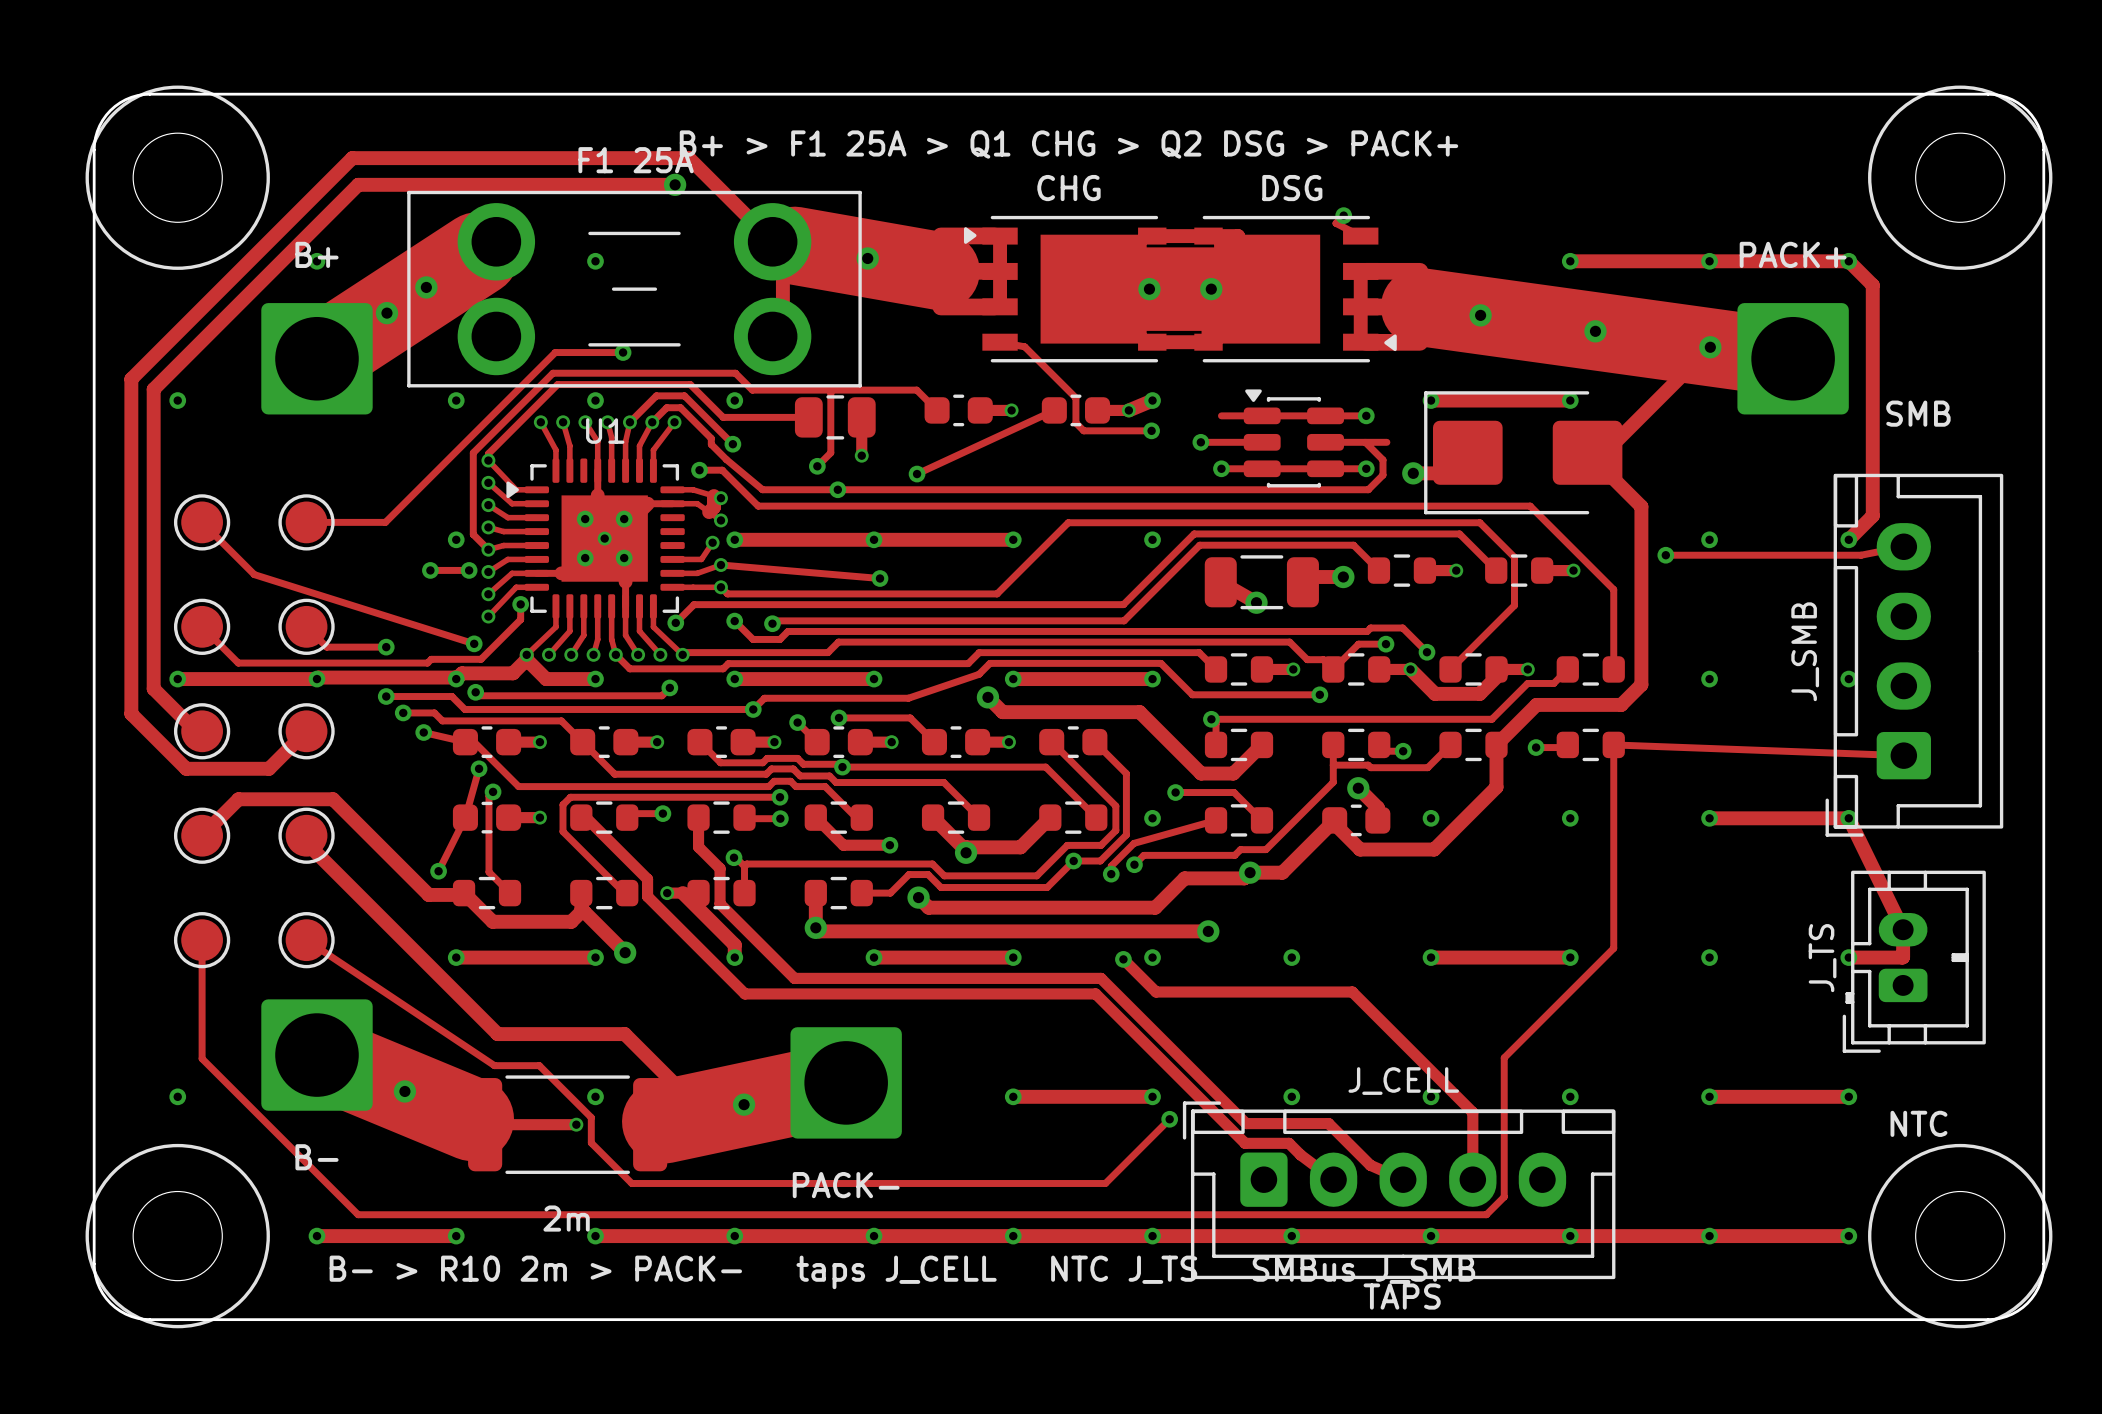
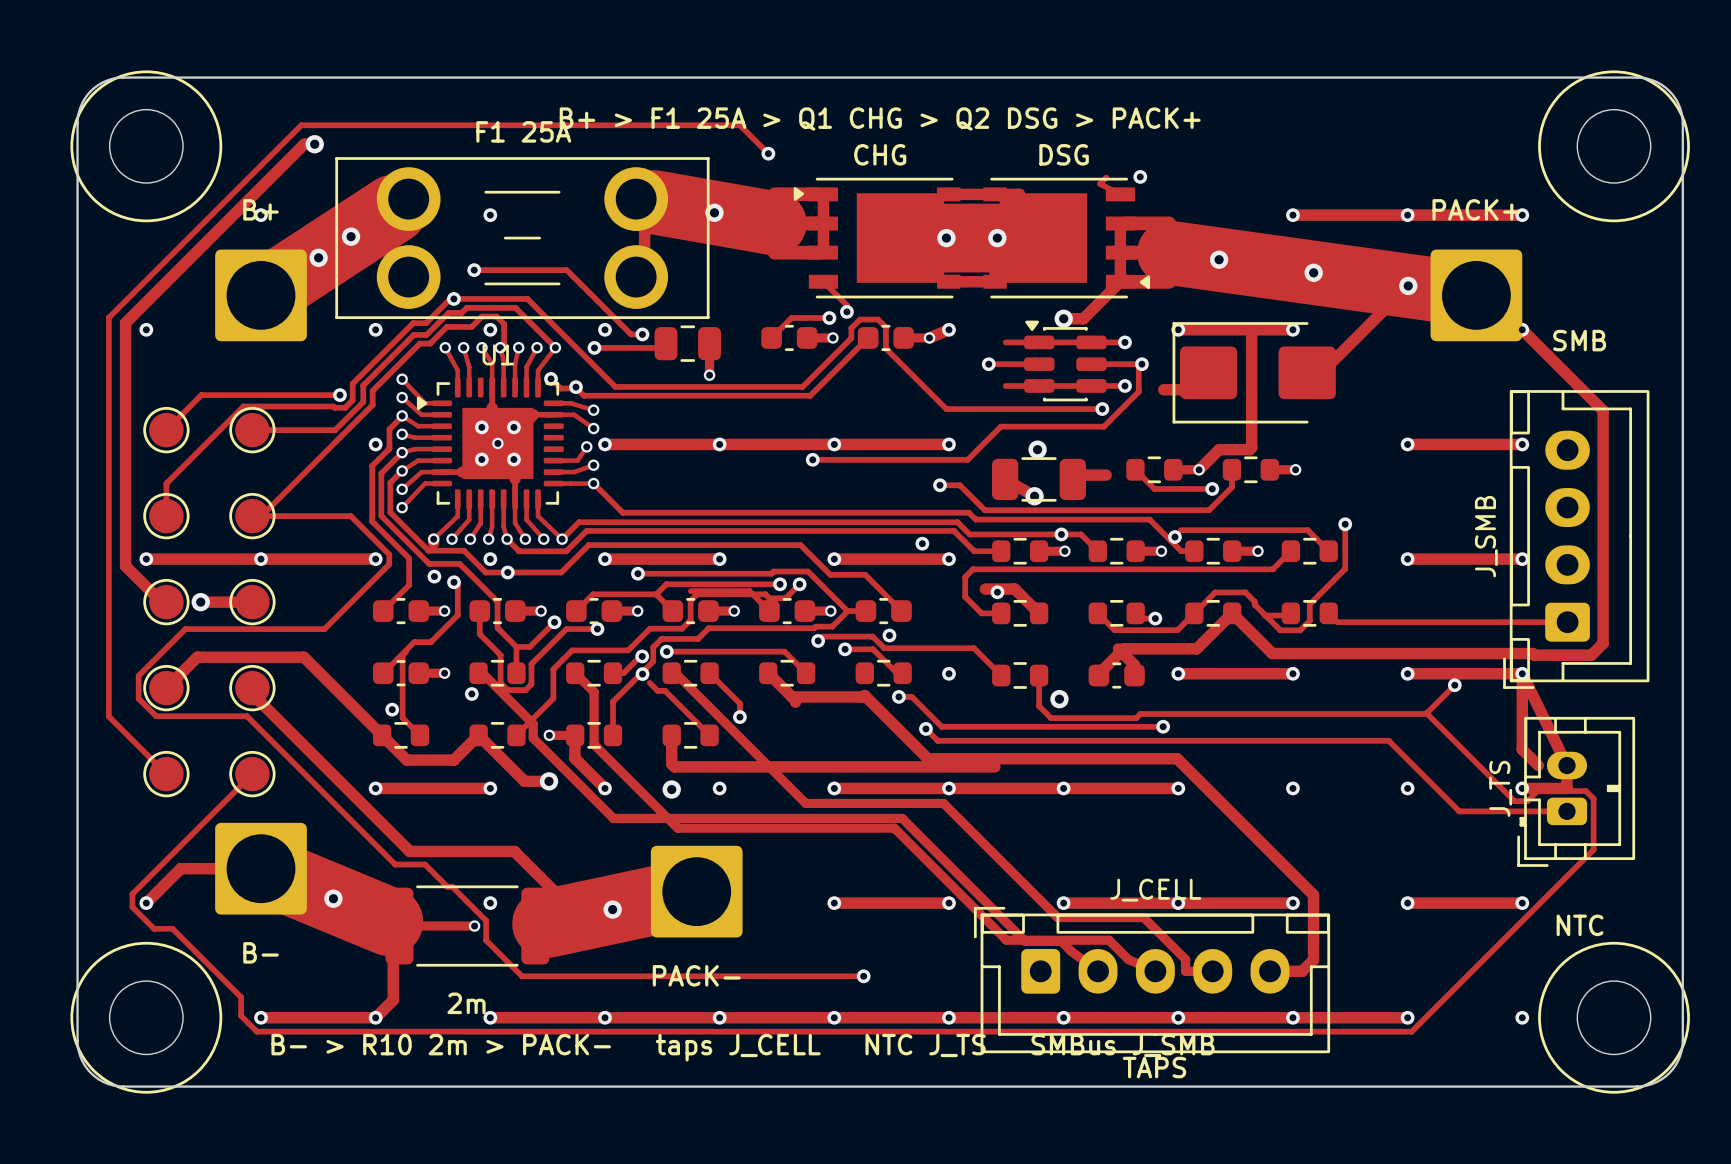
via: none -> (314, 144)
track: (675, 184) (358, 184) (153, 389) (153, 688) -> (314, 144) (304, 144) (125, 322) (126, 567)
via: (675, 184) -> none
via: none -> (768, 153)
via position: (1343, 215) -> (1140, 176)
track: (831, 252) (782, 252) (688, 158) (352, 158) (131, 379) (131, 713) (186, 768) (269, 768) (306, 731) -> (200, 602) (252, 602)
track: (1848, 261) (1872, 285) (1872, 515) (1848, 539) -> (1407, 444) (1522, 444)
track: none -> (474, 270) (566, 270) (631, 334) (642, 334)
via: none -> (474, 270)
track: (1000, 342) (1024, 346) (1075, 397) -> (823, 281) (846, 305) (846, 311)
track: none -> (1120, 281) (1083, 318) (1063, 318)
track: (623, 352) (555, 352) (385, 522) -> (555, 347) (515, 307) (466, 307) (461, 312) (448, 312) (426, 334) (413, 334) (363, 385) (363, 402) (335, 430) (317, 430)
via: (623, 352) -> none
via: none -> (453, 298)
via: none -> (846, 311)
track: none -> (829, 318) (791, 318) (771, 337)
via: none -> (829, 318)
via: none -> (1063, 318)
track: (830, 390) (830, 452) (817, 466) -> none
track: none -> (1251, 329) (1251, 447) (1249, 449) (1219, 449) (1199, 469)
track: none -> (1522, 329) (1603, 410) (1603, 643) (1591, 655) (1272, 653) (1232, 613) (1196, 648) (1123, 648) (1098, 675)
via: none -> (1522, 329)
via: none -> (642, 334)
track: (937, 410) (916, 390) (752, 390) (735, 373) (552, 373) (473, 452) (473, 534) (488, 549) -> (516, 646) (497, 628) (497, 601) (459, 563) (429, 563) (381, 516) (381, 473) (402, 452)
track: (1054, 410) (917, 474) -> (868, 337) (810, 395) (583, 395) (576, 388) (560, 388) (551, 378)
track: (808, 417) (723, 417) (690, 384) (557, 384) (488, 453) (488, 460) -> (665, 343) (661, 347) (594, 347)
track: none -> (500, 347) (504, 343) (504, 324) (496, 316) (481, 316) (471, 326) (446, 326) (430, 343) (419, 343) (372, 390) (372, 404) (261, 516)
track: (629, 422) (656, 395) (684, 395) (732, 444) -> none
track: (652, 422) (666, 407) (680, 407) (711, 438) (711, 444) (762, 489) (1368, 489) (1383, 475) (1383, 459) (1365, 442) -> none
track: (1075, 423) (1083, 430) (1151, 430) -> (885, 348) (946, 409) (1102, 409)
via: (1151, 430) -> none
track: none -> (1137, 364) (1138, 391) (1103, 426) (1000, 426) (967, 459) (812, 459)
via: none -> (1141, 364)
via position: (732, 444) -> (594, 347)
track: (1587, 452) (1641, 506) (1641, 684) (1621, 704) (1536, 704) (1496, 744) (1496, 787) (1434, 849) (1360, 849) (1334, 824) (1334, 820) (1282, 872) (1250, 872) (1244, 878) (1184, 878) (1155, 907) (928, 907) (918, 897) -> none
via: none -> (551, 378)
via: (817, 466) -> none
via: (1221, 468) -> none
track: (699, 470) (722, 470) (758, 506) (1530, 506) (1613, 589) (1613, 669) -> (1180, 530) (1307, 530) (1328, 551)
via: (1413, 473) -> none
via: (917, 474) -> none
via: none -> (339, 395)
via: (837, 489) -> none
track: (713, 496) (713, 507) (709, 512) -> none
via: none -> (1102, 409)
track: none -> (402, 416) (389, 429) (389, 448) (372, 465) (372, 521) (409, 558) (409, 585) (383, 611)
track: (202, 522) (254, 574) (474, 643) -> (166, 430) (201, 395) (339, 395)
track: none -> (834, 444) (948, 444)
via: none -> (1037, 449)
track: (1903, 546) (1861, 555) (1665, 555) -> none
via: (1665, 555) -> none
via: none -> (812, 459)
track: (720, 565) (880, 578) -> none
track: (430, 570) (469, 570) -> none
via: (430, 570) -> none
via: (469, 570) -> none
track: (1378, 570) (1353, 545) (1199, 545) (1124, 620) (775, 620) (772, 623) -> (1135, 469) (1154, 488) (1212, 488)
track: (1496, 570) (1459, 533) (1194, 533) (1123, 604) (694, 604) (675, 622) -> (1231, 469) (1231, 487) (1209, 510) (984, 510) (959, 485) (940, 485)
track: none -> (402, 470) (390, 482) (390, 512) (428, 550) (463, 550) (485, 572) (561, 572) (588, 545) (800, 545) (830, 574) (865, 574) (901, 611)
via: (1343, 577) -> none
via: (880, 578) -> none
via: none -> (940, 485)
track: (727, 593) (997, 593) (1068, 522) (1479, 522) (1514, 557) (1514, 605) (1450, 669) -> (599, 489) (622, 512) (968, 512) (975, 519) (1149, 519) (1181, 551) (1194, 551)
via: none -> (1212, 488)
track: (520, 604) (520, 619) (481, 659) (431, 659) (427, 663) (238, 663) (202, 626) -> (885, 327) (878, 319) (860, 319) (851, 328) (851, 338) (802, 386) (615, 386) (527, 298) (450, 298) (426, 323) (413, 323) (352, 383) (352, 400) (345, 407) (243, 406) (166, 483) (166, 516)
via: (520, 604) -> none
track: (734, 621) (753, 639) (779, 639) (787, 631) (1367, 631) (1370, 628) (1402, 628) (1427, 652) -> none
via: (734, 621) -> none
via: (675, 622) -> none
via: (772, 623) -> none
track: (306, 626) (326, 647) (386, 647) -> none
track: none -> (1345, 524) (1345, 568) (1309, 604) (1309, 620) (1300, 630) (1280, 630) (1245, 592) (1215, 592) (1194, 613)
via: none -> (1345, 524)
via: (474, 643) -> none
track: (1385, 644) (1358, 644) (1333, 669) -> none
via: (1385, 644) -> none
via: (386, 647) -> none
via: none -> (1061, 534)
track: (680, 652) (828, 652) (838, 642) (1289, 642) (1307, 659) (1323, 659) -> (562, 539) (579, 522) (957, 522) (969, 534) (1081, 534) (1089, 543)
via: none -> (922, 543)
track: (629, 668) (723, 668) (728, 663) (968, 663) (979, 652) (1199, 652) (1216, 669) -> (518, 550) (566, 551) (586, 530) (953, 530) (974, 551) (1001, 551)
track: (1410, 669) (1434, 693) (1479, 693) (1504, 669) -> none
track: (316, 679) (318, 677) (456, 679) (461, 673) (512, 673) (526, 659) (546, 679) (595, 679) -> (261, 559) (375, 559)
track: (1553, 683) (1527, 683) (1491, 719) (1211, 719) (1216, 723) (1216, 744) -> (1279, 562) (1272, 569) (972, 569) (965, 577) (965, 596) (981, 613) (1001, 613)
track: (669, 687) (661, 695) (479, 695) (475, 692) -> none
via: (669, 687) -> none
via: (475, 692) -> none
track: (1319, 694) (1192, 694) (1160, 663) (990, 663) (979, 674) (908, 698) (764, 698) (753, 709) (464, 709) (451, 696) (386, 696) -> none
via: (1319, 694) -> none
via: none -> (507, 572)
via: (386, 696) -> none
track: none -> (637, 573) (771, 573) (773, 571) (808, 571) (847, 611)
via: none -> (637, 573)
track: (987, 697) (1002, 712) (1139, 712) (1201, 773) (1233, 773) (1261, 744) -> (985, 589) (1014, 589) (1039, 613)
via position: (987, 697) -> (799, 584)
via: none -> (434, 576)
track: none -> (454, 582) (457, 586) (457, 615) (430, 642) (414, 642) (383, 673)
via: none -> (454, 582)
via: (753, 709) -> none
via: none -> (780, 584)
track: (403, 712) (434, 712) (442, 720) (561, 720) (614, 774) (766, 774) (771, 768) (793, 768) (800, 775) (803, 776) -> (613, 713) (613, 701) (653, 661) (653, 647) (661, 638)
via: (403, 712) -> none
via: (839, 717) -> none
via: (797, 722) -> none
via: none -> (200, 602)
track: (423, 732) (465, 742) (474, 742) (518, 786) (768, 786) (774, 781) (790, 781) (795, 786) (825, 786) (856, 817) (861, 817) -> (739, 717) (739, 703) (709, 673)
via: (423, 732) -> none
track: none -> (479, 611) (479, 634) (500, 655) (500, 683) (507, 690) (525, 690) (531, 684) (531, 664) (566, 629) (597, 629)
track: (699, 742) (720, 762) (762, 762) (767, 758) (797, 758) (803, 764) (839, 764) (842, 767) (1045, 767) (1096, 817) -> (576, 611) (593, 594) (656, 594) (666, 584) (780, 584)
track: (1051, 742) (1115, 806) (1115, 830) (1101, 845) (1067, 845) (1036, 875) (944, 875) (932, 864) (746, 864) (744, 866) (734, 857) -> (865, 611) (847, 611) (832, 626) (708, 628) (698, 638) (683, 638)
track: (1094, 742) (1126, 773) (1126, 834) (1100, 861) (1073, 861) (1047, 887) (941, 887) (928, 874) (909, 874) (890, 893) (861, 893) -> (649, 682) (657, 690) (665, 690) (709, 735)
track: (1333, 744) (1333, 782) (1265, 849) (1240, 849) (1234, 855) (1143, 855) (1134, 864) -> none
track: none -> (1328, 613) (1337, 622) (1567, 622)
via: (1536, 747) -> none
track: none -> (554, 622) (529, 646) (516, 646)
via: none -> (554, 622)
track: (1903, 755) (1613, 744) (1613, 948) (1504, 1057) (1504, 1196) (1486, 1214) (358, 1214) (202, 1058) (202, 940) -> (768, 153) (739, 125) (301, 125) (108, 317) (108, 716) (166, 774)
via: none -> (597, 629)
track: (1333, 765) (1368, 765) (1370, 767) (1427, 767) (1430, 765) -> (1097, 613) (1114, 630) (1177, 630)
via: (842, 767) -> none
track: (479, 768) (465, 817) (438, 871) -> none
via: (479, 768) -> none
via: none -> (889, 635)
track: (829, 775) (836, 782) (943, 782) (952, 791) -> (666, 651) (784, 651)
via: none -> (818, 640)
track: none -> (845, 649) (873, 649) (896, 673) (902, 673)
via: none -> (845, 649)
via: (1358, 788) -> none
via: (493, 791) -> none
via: none -> (666, 651)
track: (1175, 792) (1234, 792) (1261, 820) -> (1427, 714) (1140, 714) (1136, 718) (1051, 718) (1039, 706) (1039, 675)
via: (1175, 792) -> none
track: (780, 797) (570, 797) (562, 804) (562, 831) (624, 893) (627, 893) -> (799, 584) (785, 598) (769, 598) (765, 594) (697, 594) (690, 600) (690, 620) (682, 628) (649, 628) (628, 650) (572, 650) (553, 669) (553, 698) (516, 735)
track: (238, 799) (333, 799) (428, 894) (462, 894) (464, 893) -> (196, 658) (303, 657) (382, 735)
track: (662, 813) (631, 813) (627, 817) -> (516, 646) (516, 673)
via: (662, 813) -> none
track: (698, 817) (698, 847) (720, 868) (720, 903) (794, 978) (1100, 978) (1246, 1123) (1328, 1123) (1346, 1141) -> (575, 673) (594, 692) (594, 744) (677, 828) (894, 828) (1006, 940) (1109, 940)
track: (744, 817) (780, 818) -> (613, 673) (623, 673) (637, 659)
track: (815, 817) (843, 845) (889, 845) -> none
track: (1050, 817) (1020, 847) (961, 846) -> (1270, 971) (1302, 971) (1313, 959) (1313, 895) (1177, 758) (927, 758) (864, 695) (792, 696)
track: none -> (1522, 673) (1522, 749) (1538, 765)
track: (1216, 820) (1133, 843) (1111, 866) (1111, 874) -> (1001, 675) (973, 648) (884, 648) (872, 636) (822, 636) (818, 640)
track: none -> (1454, 685) (1427, 714)
via: none -> (1454, 685)
via: none -> (471, 693)
via position: (889, 845) -> (739, 717)
track: none -> (898, 696) (911, 696) (941, 726) (1163, 726)
via: none -> (898, 696)
via: (966, 852) -> none
via: (734, 857) -> none
via: none -> (392, 709)
via: (1073, 861) -> none
via: (1134, 864) -> none
track: none -> (1427, 714) (1514, 801) (1527, 801) (1537, 791) (1585, 791) (1593, 798) (1593, 849) (1411, 1031) (256, 1031) (241, 1015) (241, 997) (172, 928) (154, 928) (132, 907) (132, 894) (252, 774)
via: (438, 871) -> none
via position: (1250, 872) -> (1059, 699)
via position: (1111, 874) -> (925, 728)
via: none -> (1163, 726)
track: none -> (925, 728) (937, 740) (1388, 740) (1459, 811) (1567, 811)
track: (682, 893) (734, 944) (734, 957) -> (574, 735) (574, 758) (604, 788)
via: (918, 897) -> none
track: (581, 911) (571, 921) (492, 921) -> (549, 781) (524, 781) (478, 735) (453, 760) (405, 758)
track: (581, 911) (584, 911) (625, 952) -> none
via position: (815, 927) -> (671, 789)
via: (1208, 931) -> none
track: (306, 940) (494, 1065) (539, 1065) (591, 1117) (591, 1142) -> (252, 516) (350, 516) (389, 554) (389, 564) (324, 629) (185, 629) (138, 675) (138, 698) (156, 716) (246, 716) (395, 864) (425, 864) (447, 886) (452, 886) (486, 920) (486, 941)
via position: (625, 952) -> (549, 781)
track: (874, 957) (1013, 957) -> (1178, 788) (834, 788)
track: (1431, 957) (1570, 957) -> (1178, 673) (1292, 673)
track: (1123, 959) (1156, 992) (1352, 992) (1472, 1112) (1472, 1179) -> (671, 673) (675, 673) (805, 803) (943, 803) (1057, 917) (1143, 917) (1185, 959) (1185, 971) (1212, 971)
via: (1123, 959) -> none
track: none -> (261, 868) (180, 868) (146, 903)
track: none -> (1063, 903) (1292, 903)
track: (1169, 1119) (1105, 1183) (631, 1183) -> (863, 976) (522, 976) (520, 974)
via: (1169, 1119) -> none
track: none -> (393, 926) (393, 1000) (375, 1017)
via: none -> (863, 976)
track: (1709, 1236) (1848, 1236) -> (1407, 559) (1522, 559)

